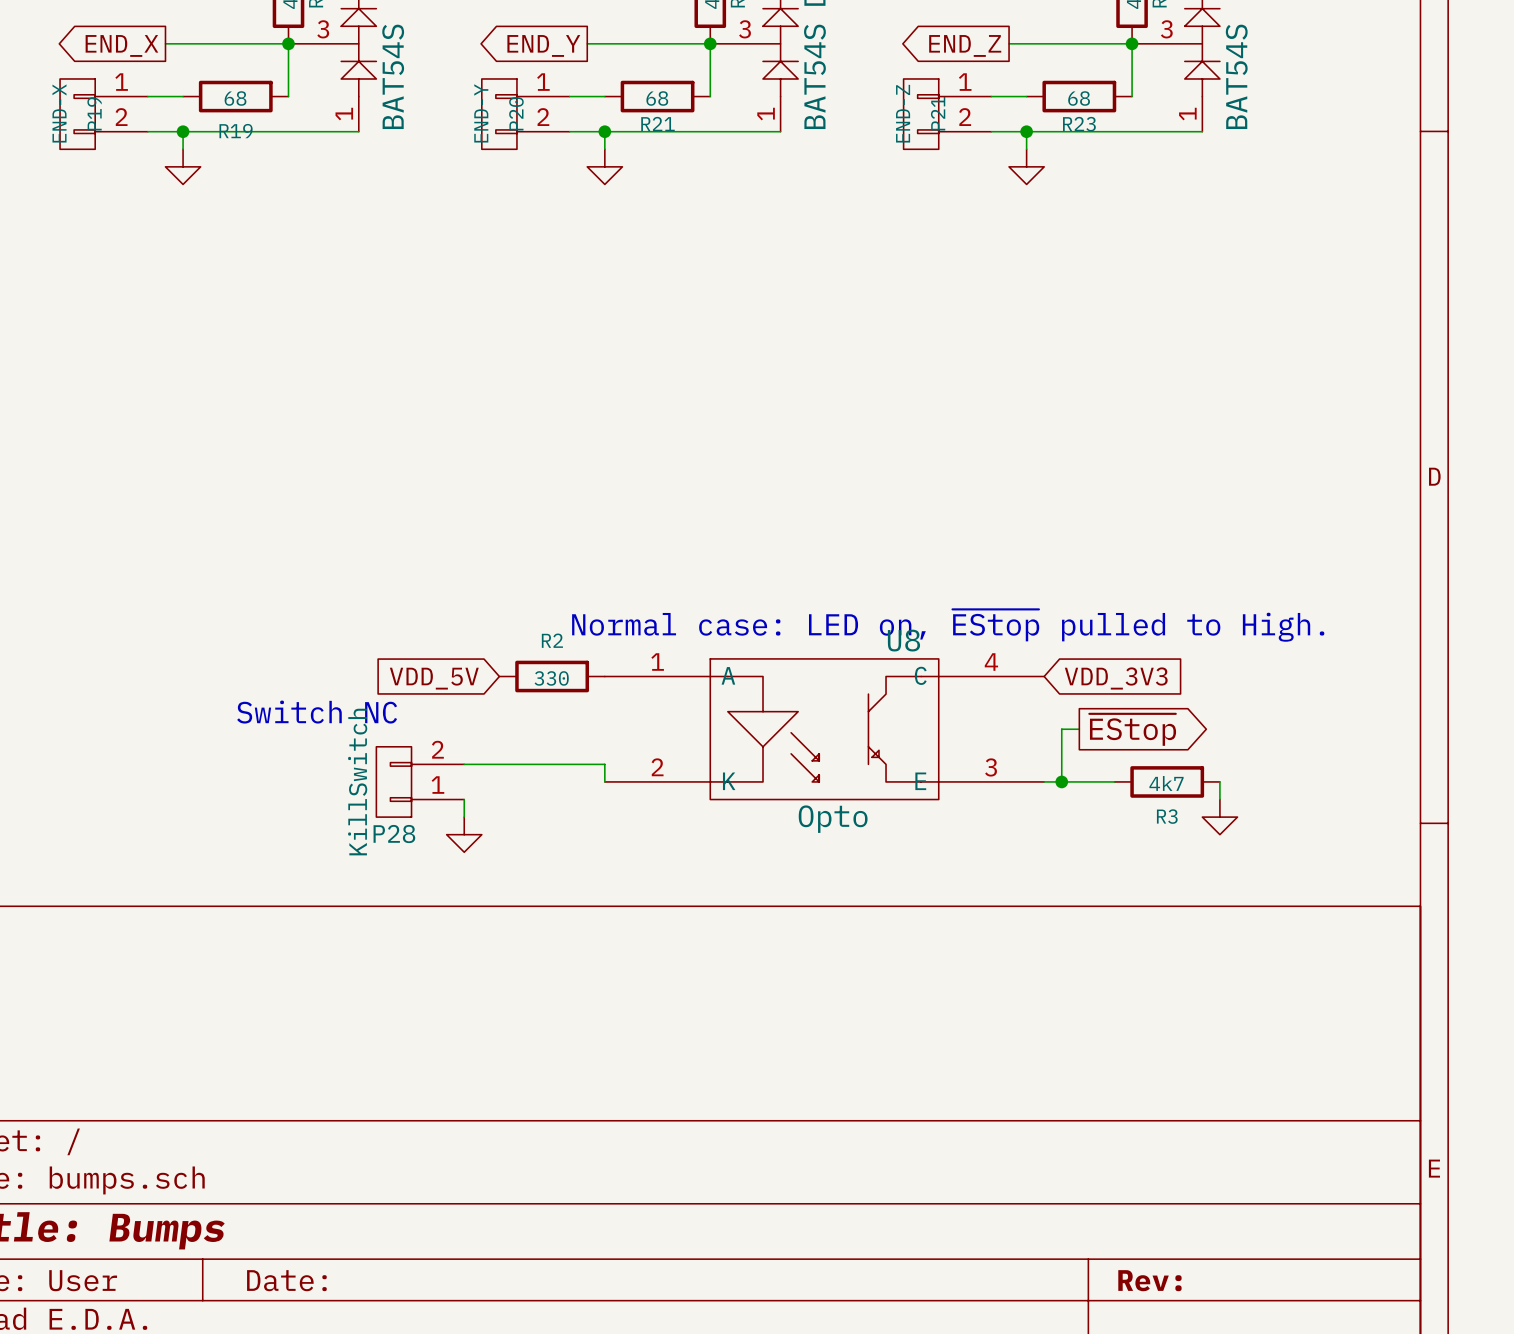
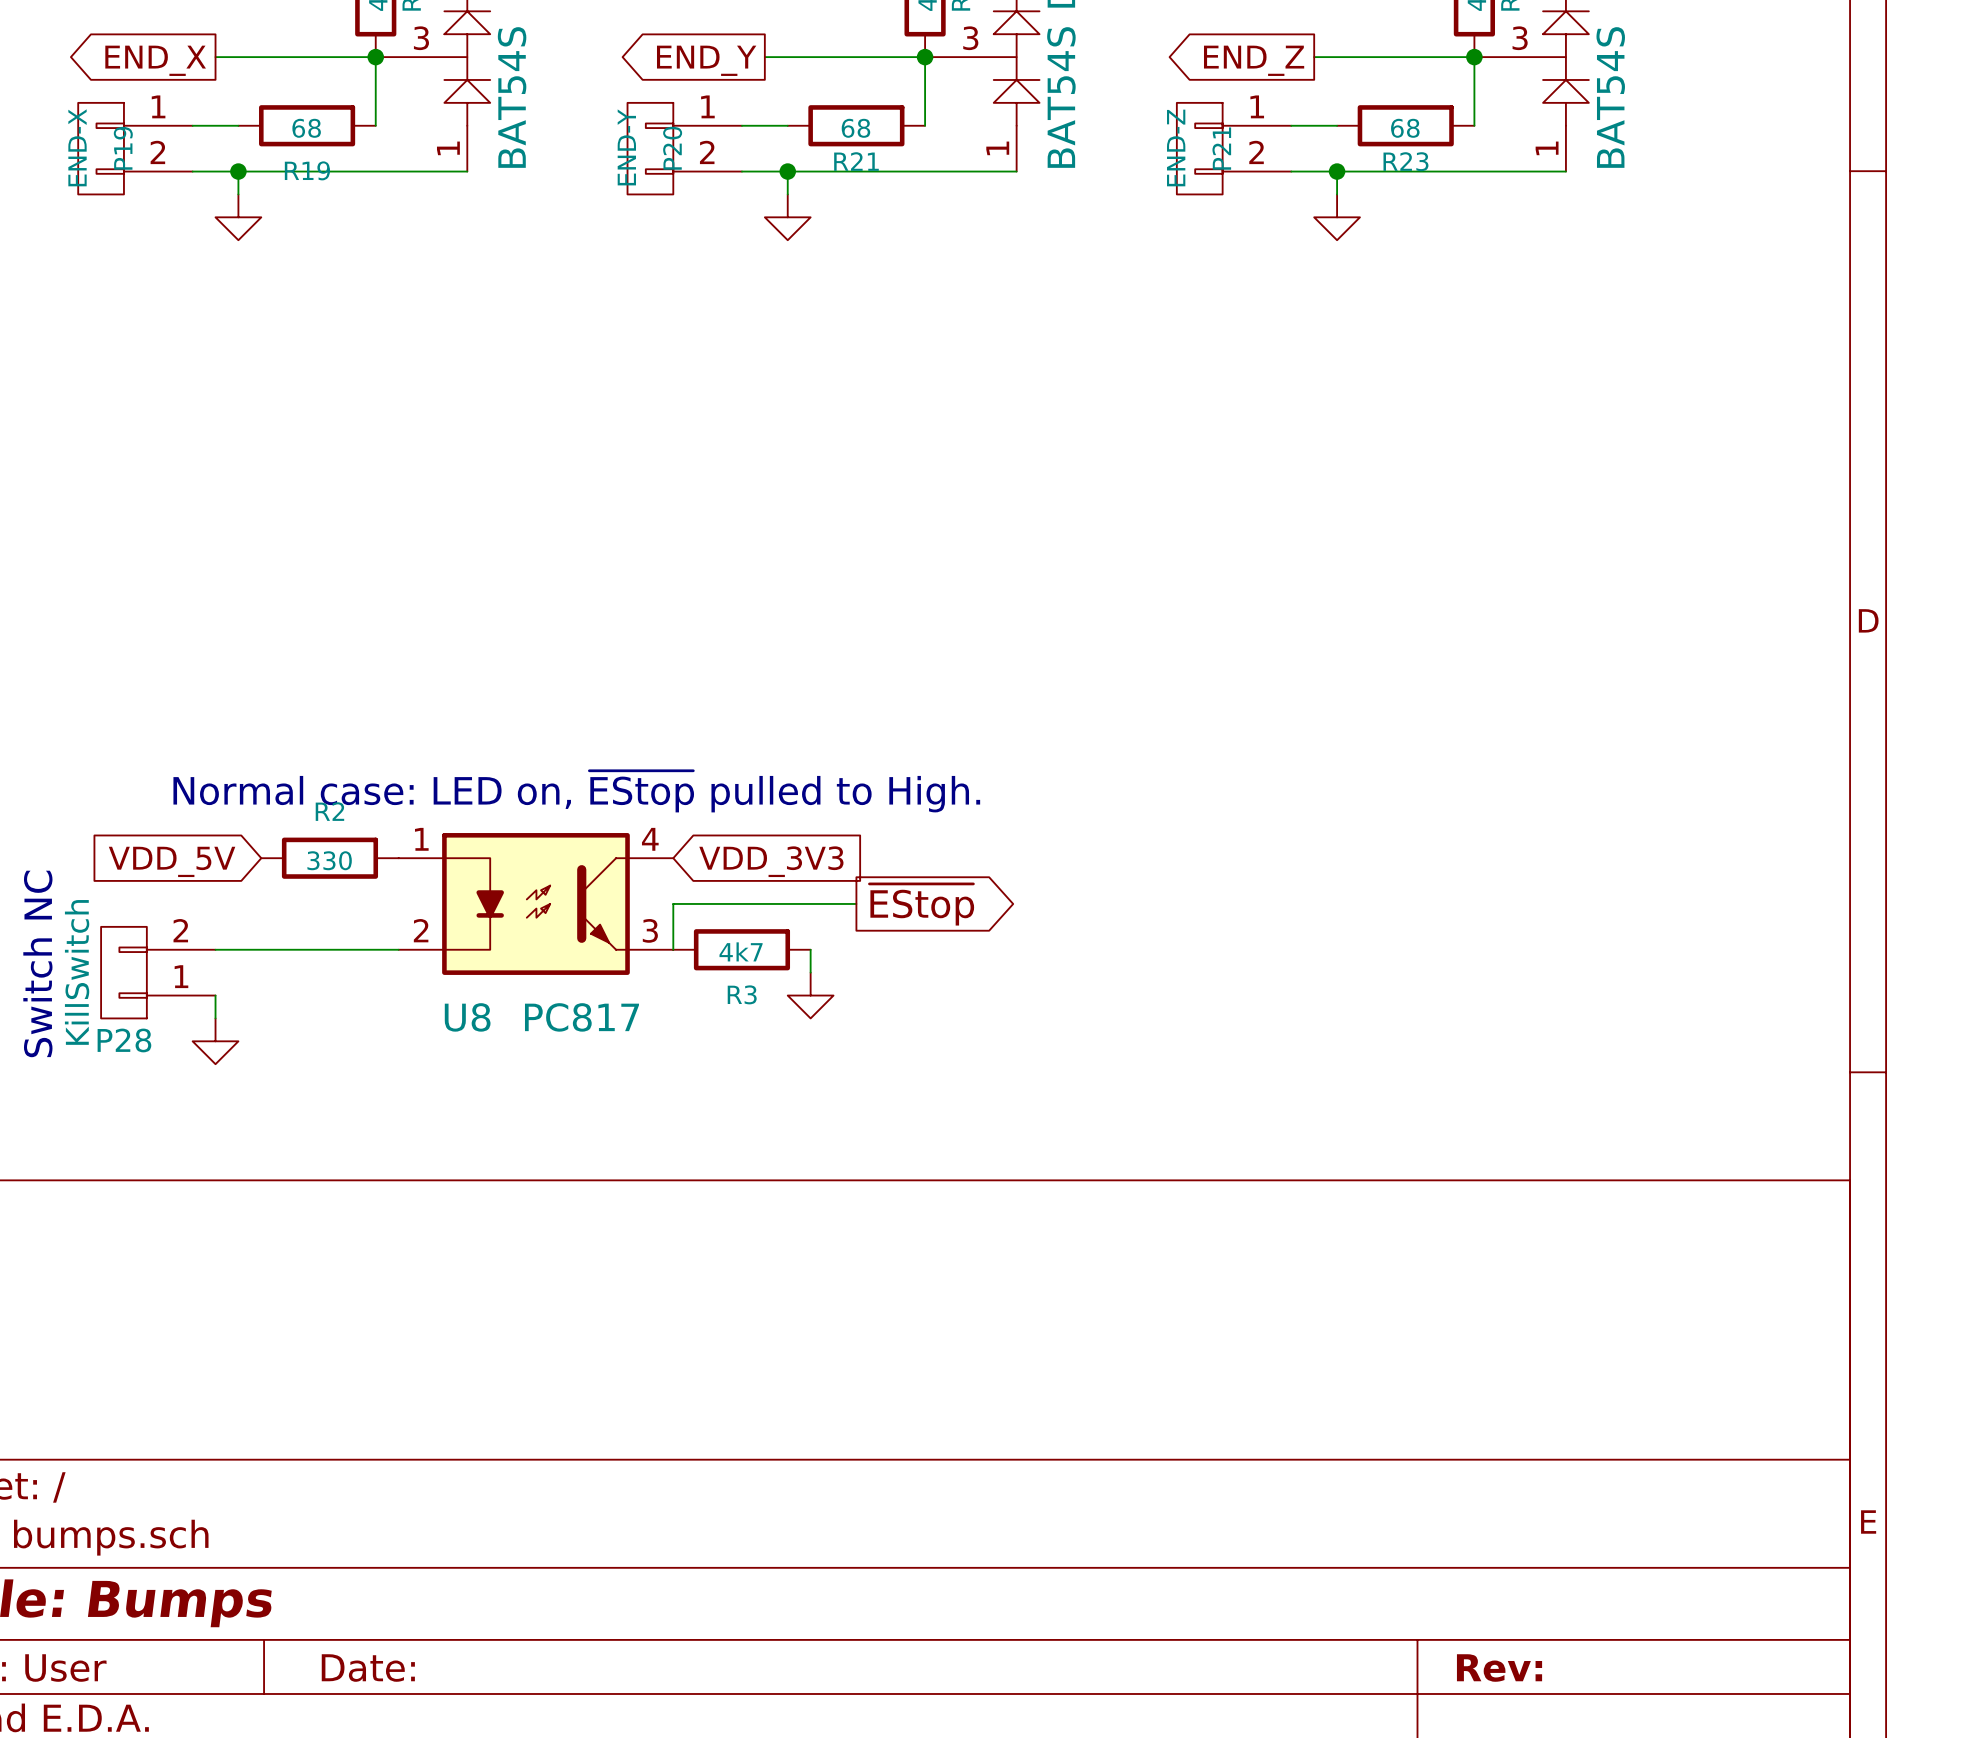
text: none -> Normal case: LED on, ~{EStop} pulled to High. (576, 791)
text: Normal case: LED on, ~{EStop} pulled to High. (948, 625) -> none
U8 name position: U8 (903, 640) -> U8 (467, 1017)
U8 symbol: [604, 658, 1045, 800] -> [398, 833, 674, 975]
global label: none -> VDD_3V3 (771, 861)
R2 position: (552, 676) -> (329, 858)
global label position: VDD_5V (434, 678) -> VDD_5V (172, 861)
global label: VDD_3V3 (1116, 678) -> none
wire: none -> (856, 903) (673, 903) (673, 949)
global label: none -> ~{EStop} (921, 904)
text rotation: 0° (317, 712) -> 90° counterclockwise (37, 963)
text position: Switch NC (317, 712) -> Switch NC (37, 963)
wire: none -> (215, 949) (398, 949)
wire: (1079, 729) (1061, 729) (1061, 781) -> none
global label: ~{EStop} (1132, 729) -> none
wire: none -> (215, 995) (215, 1018)
wire: (464, 764) (604, 764) (604, 781) -> none
power symbol: none -> (810, 995)
P28 position: (420, 781) -> (158, 972)
wire: (1044, 781) (1114, 781) -> none
junction: (1061, 781) -> none
R3 position: (1167, 781) -> (741, 949)
wire: (1219, 781) (1219, 799) -> none
power symbol: none -> (215, 1041)
wire: (464, 799) (464, 817) -> (810, 949) (810, 972)
power symbol: (1219, 817) -> none
U8 value: Opto (833, 819) -> PC817 (581, 1017)
power symbol: (464, 834) -> none

